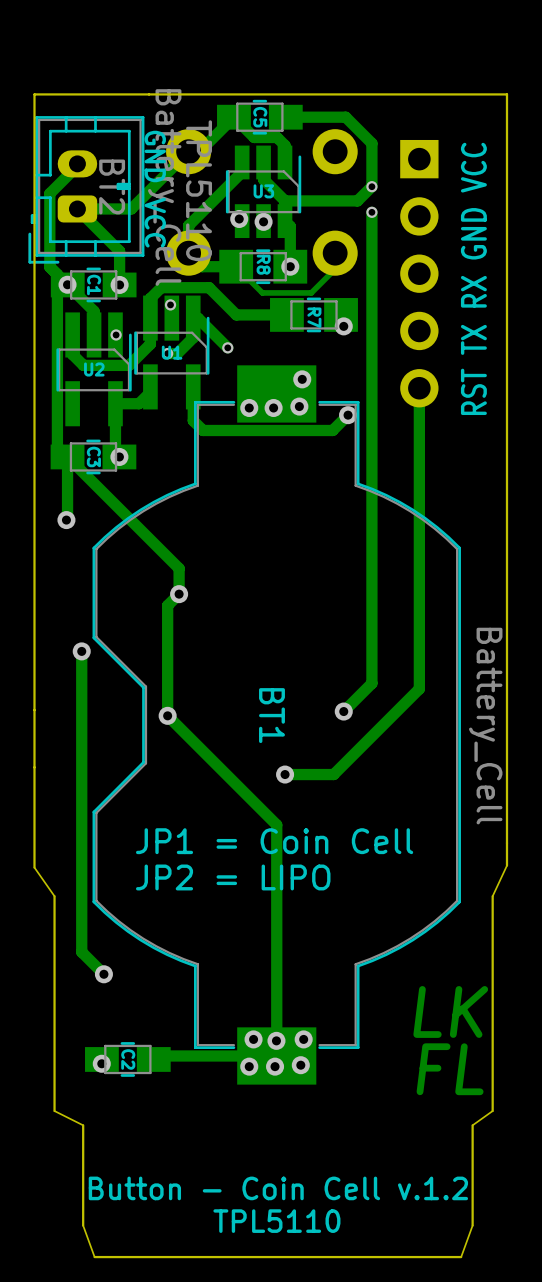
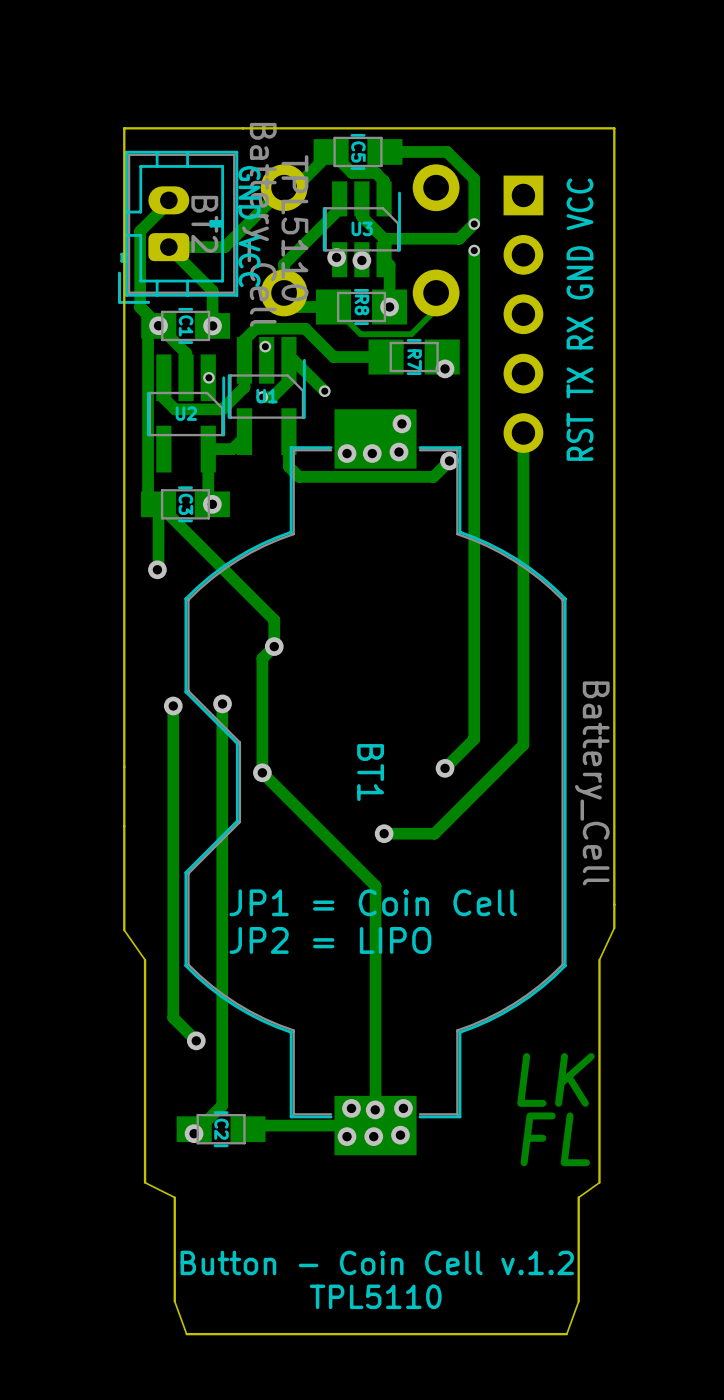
track: none -> (222, 704) (222, 1105) (194, 1133)
via: none -> (222, 703)

